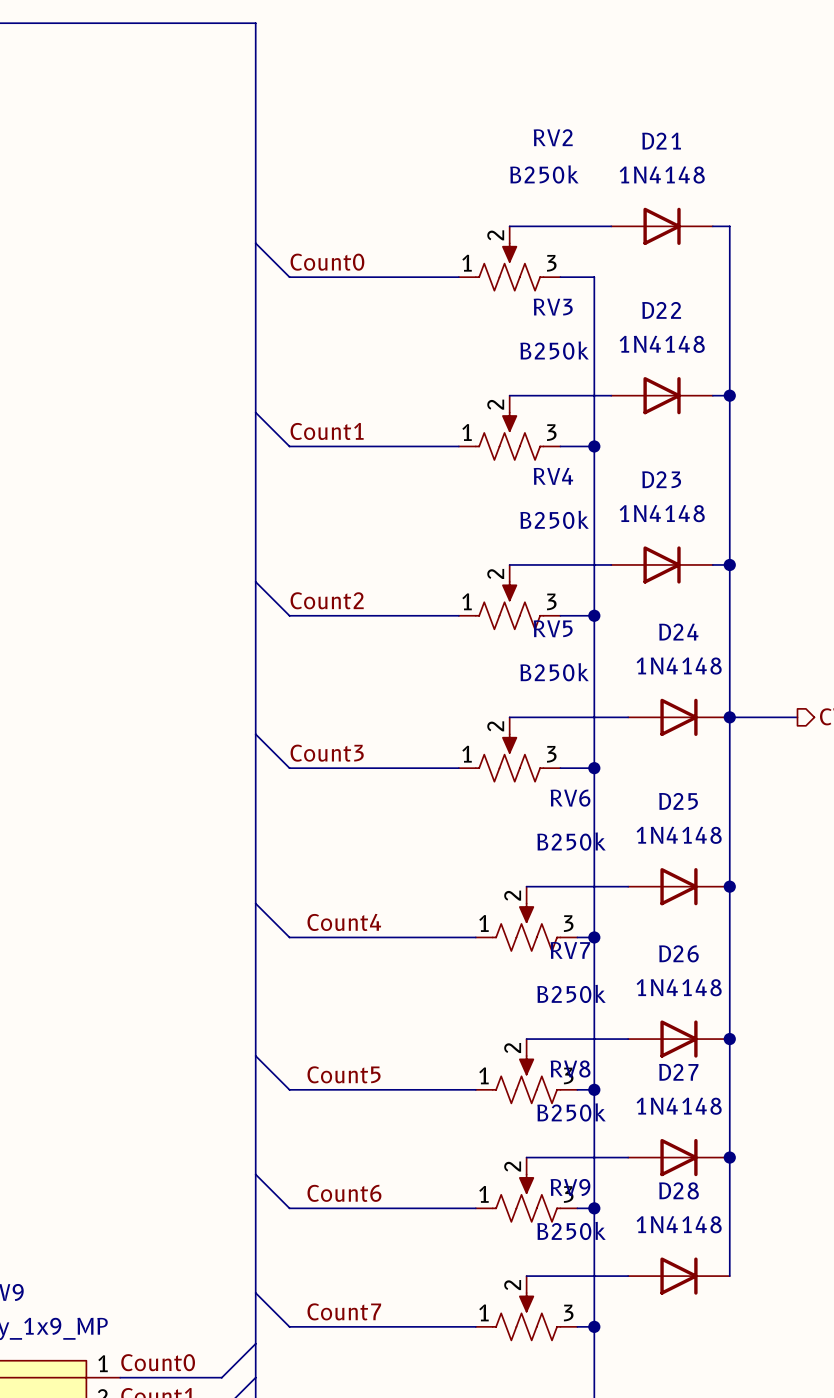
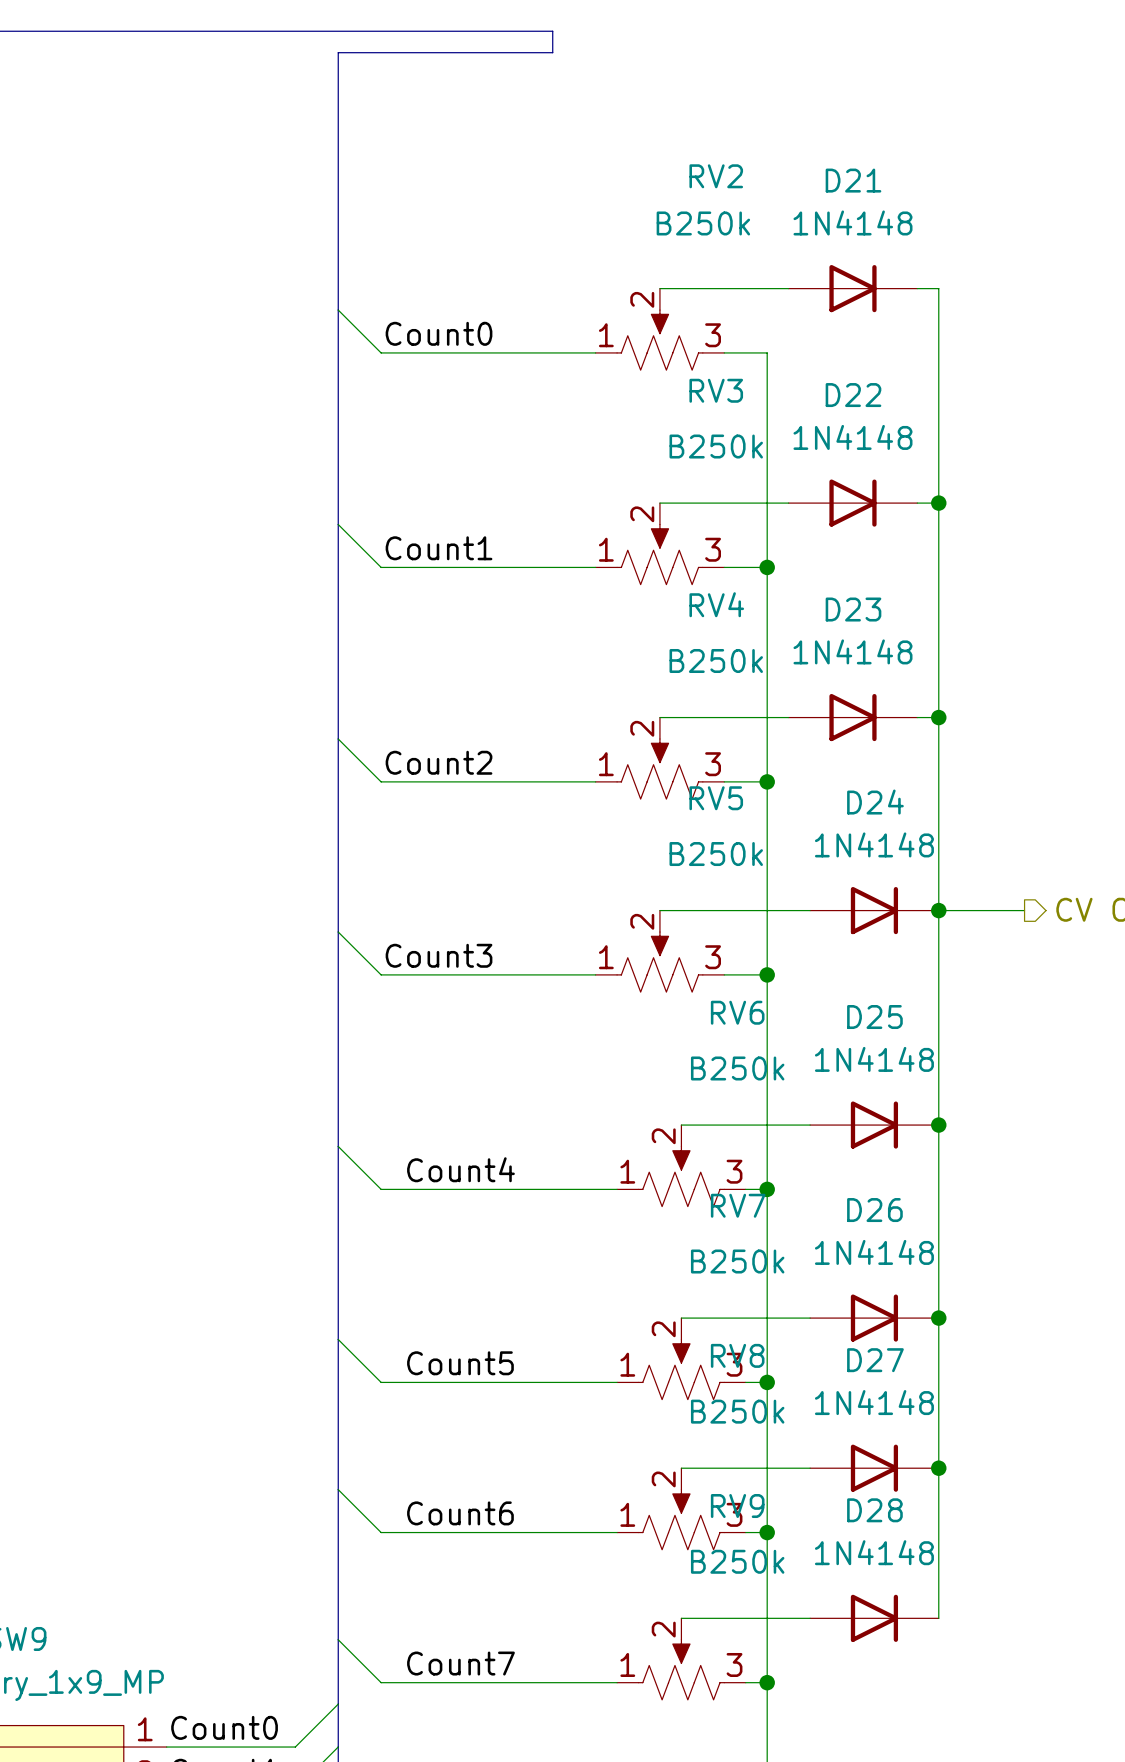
bus: (255, 23) (255, 40) -> (338, 31) (552, 31) (552, 52) (338, 52)

